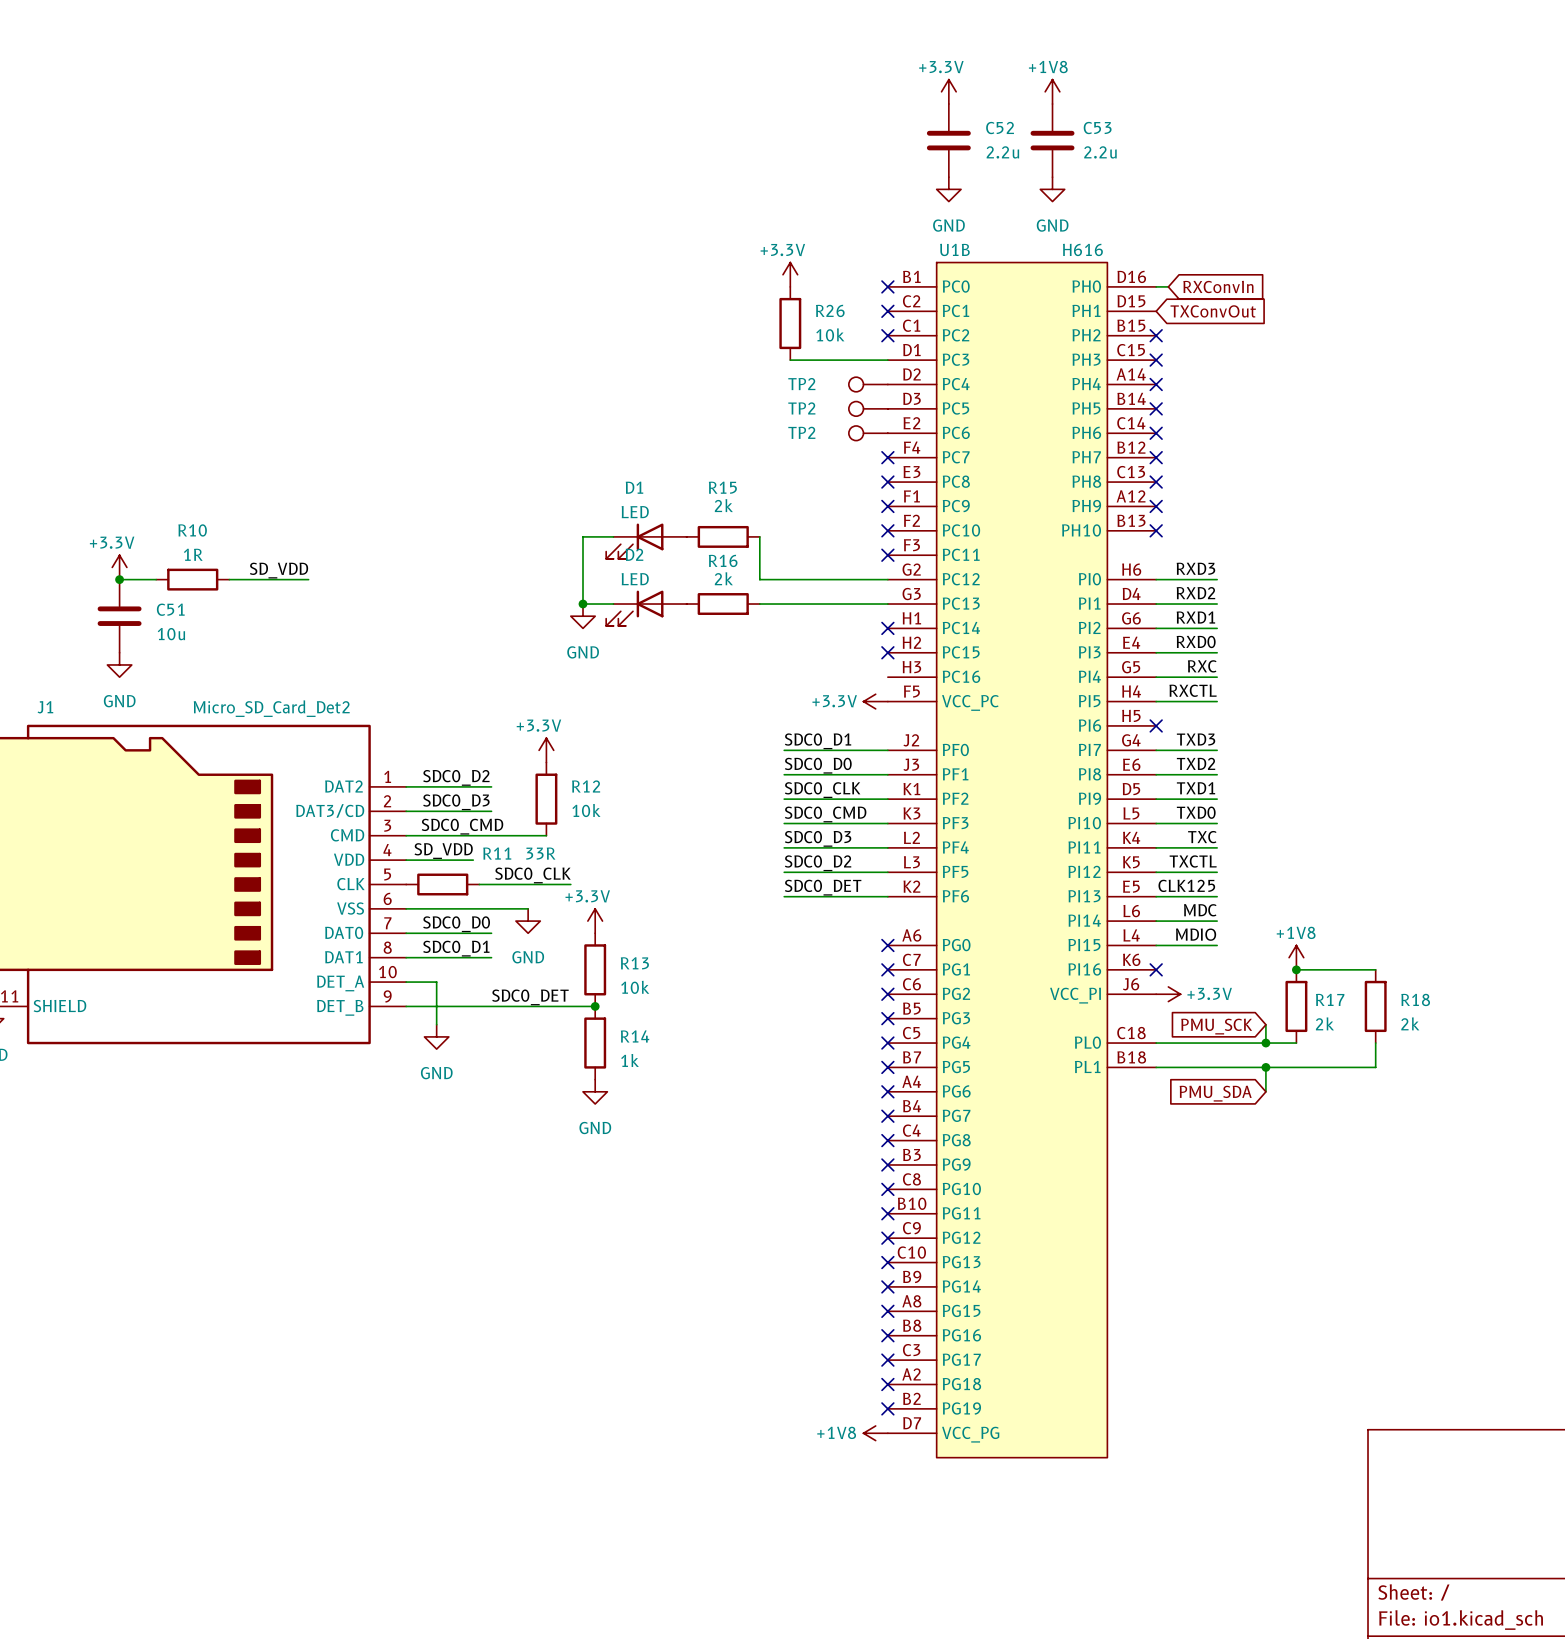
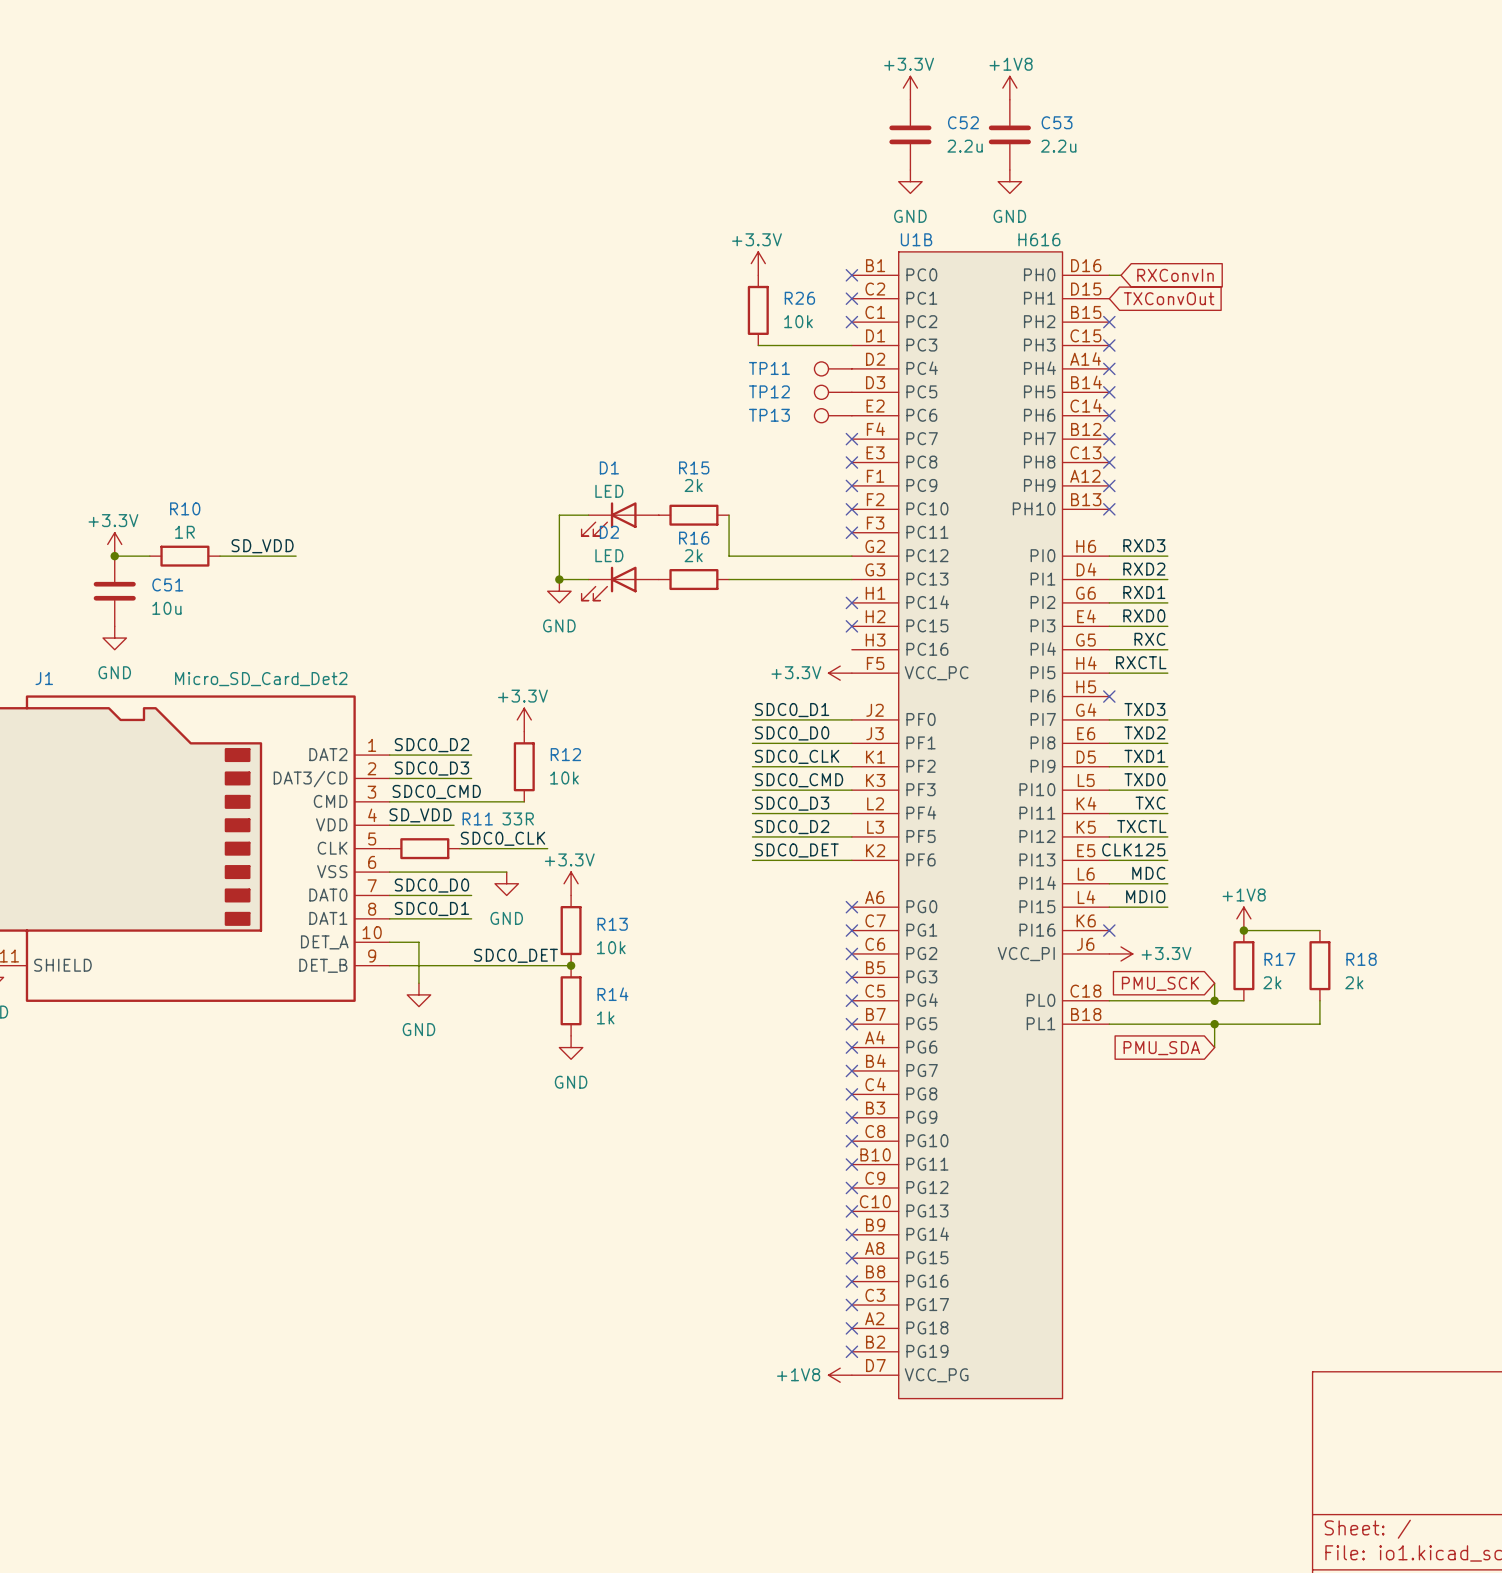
TP2 name: TP2 (801, 384) -> TP11 (769, 368)
TP2 name: TP2 (801, 408) -> TP12 (769, 391)
TP2 name: TP2 (801, 432) -> TP13 (769, 415)

